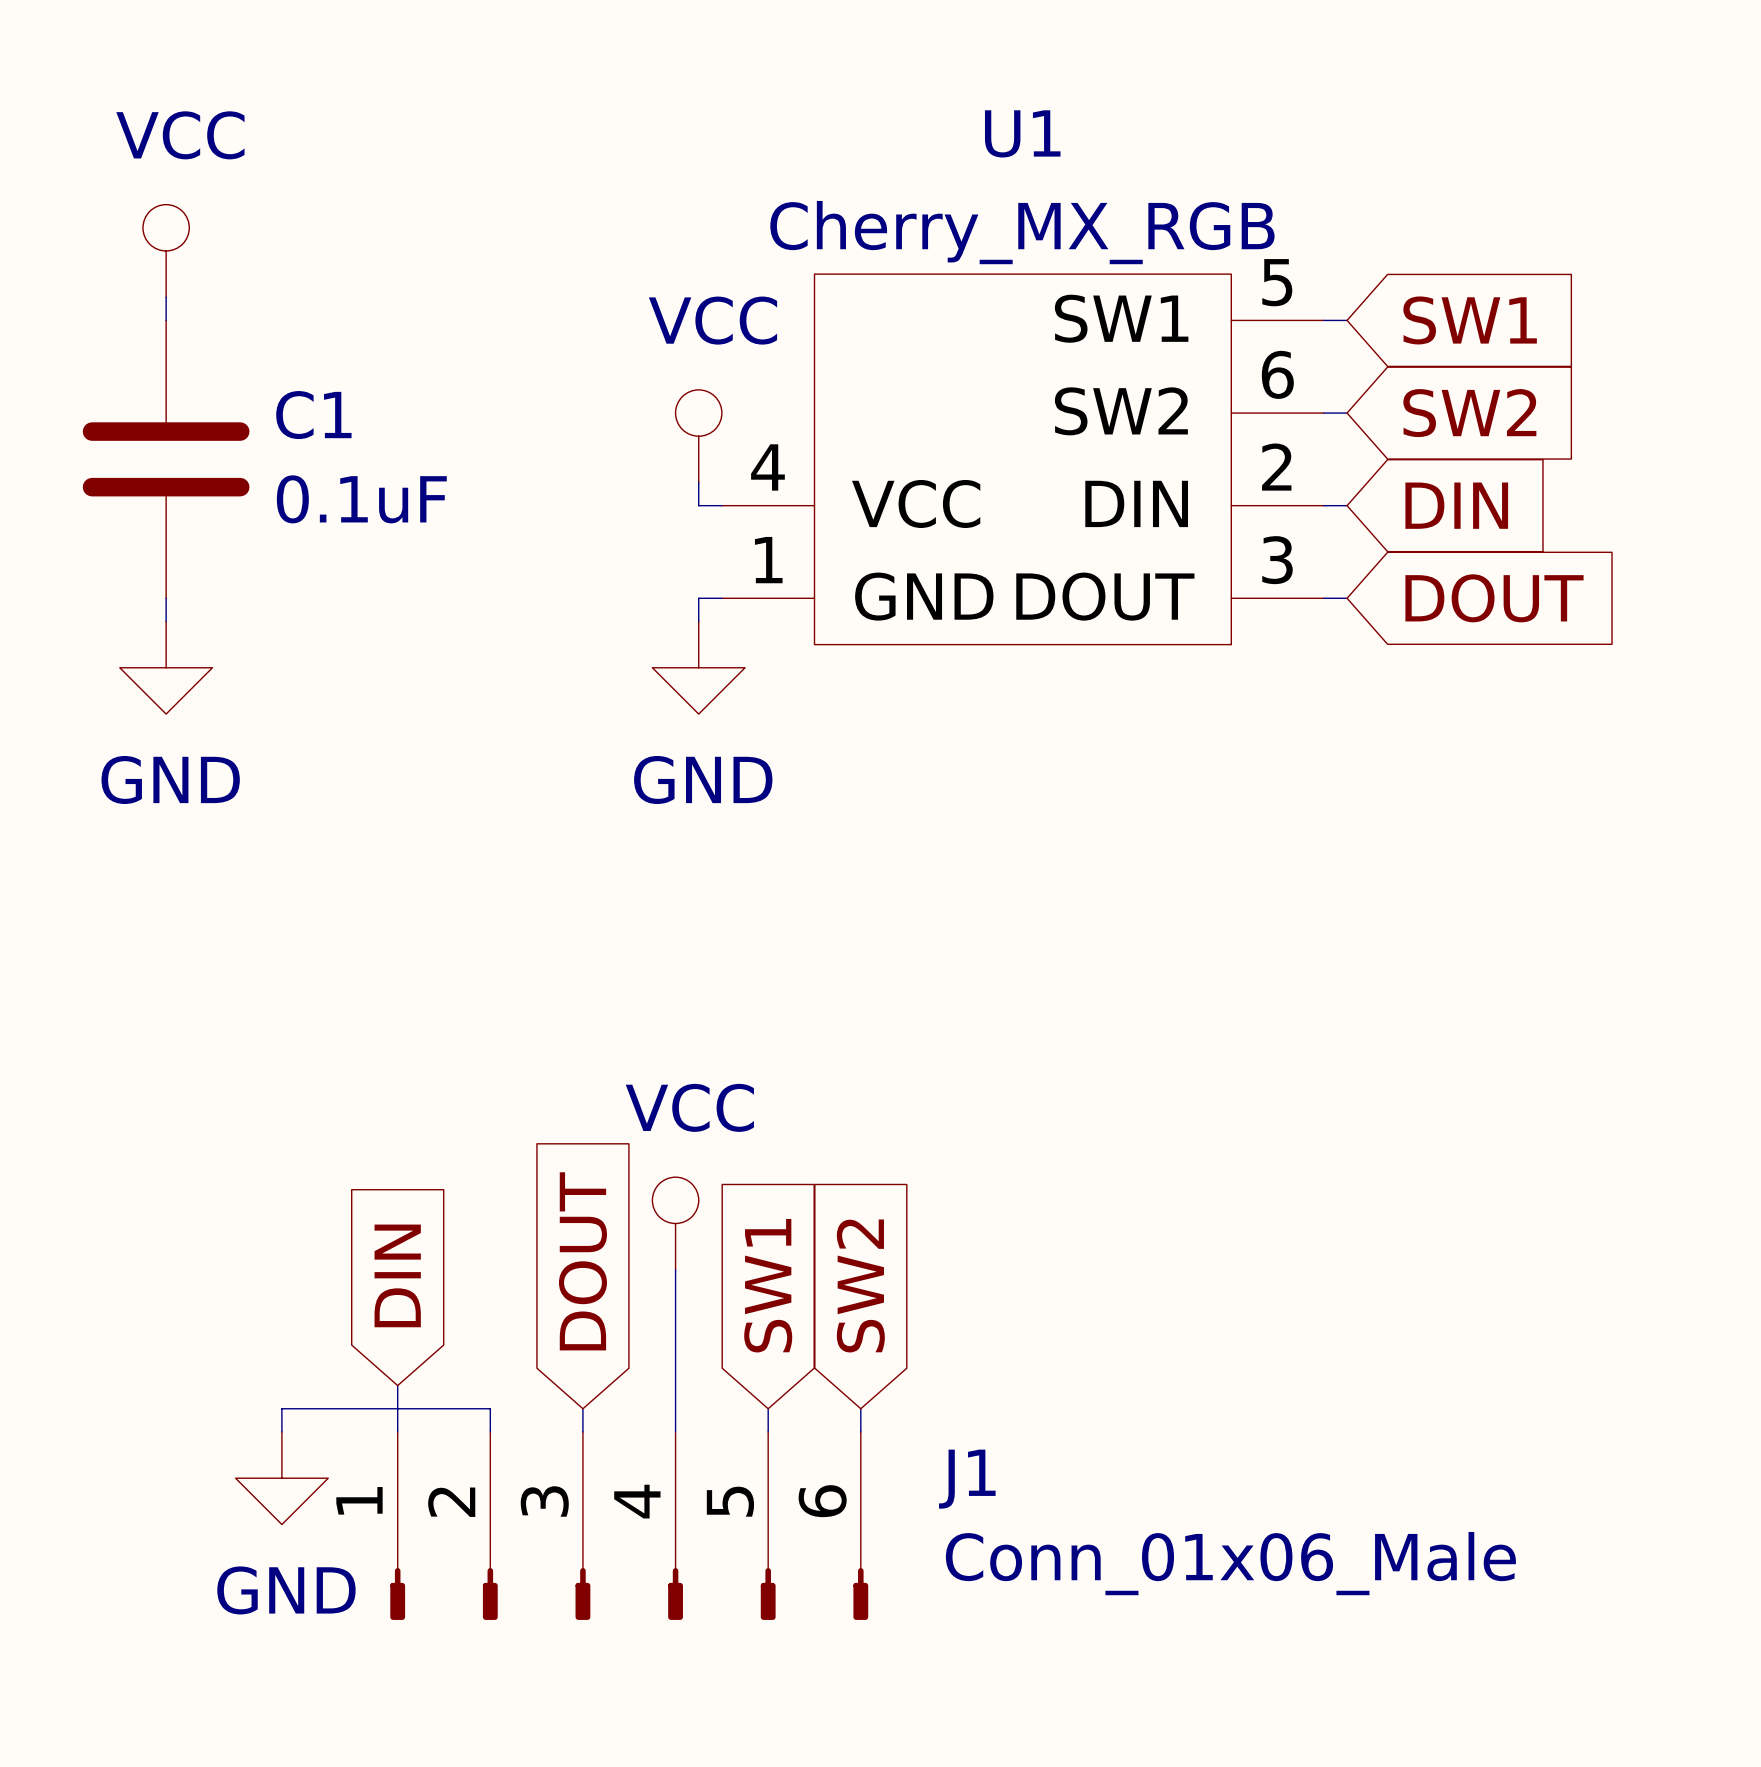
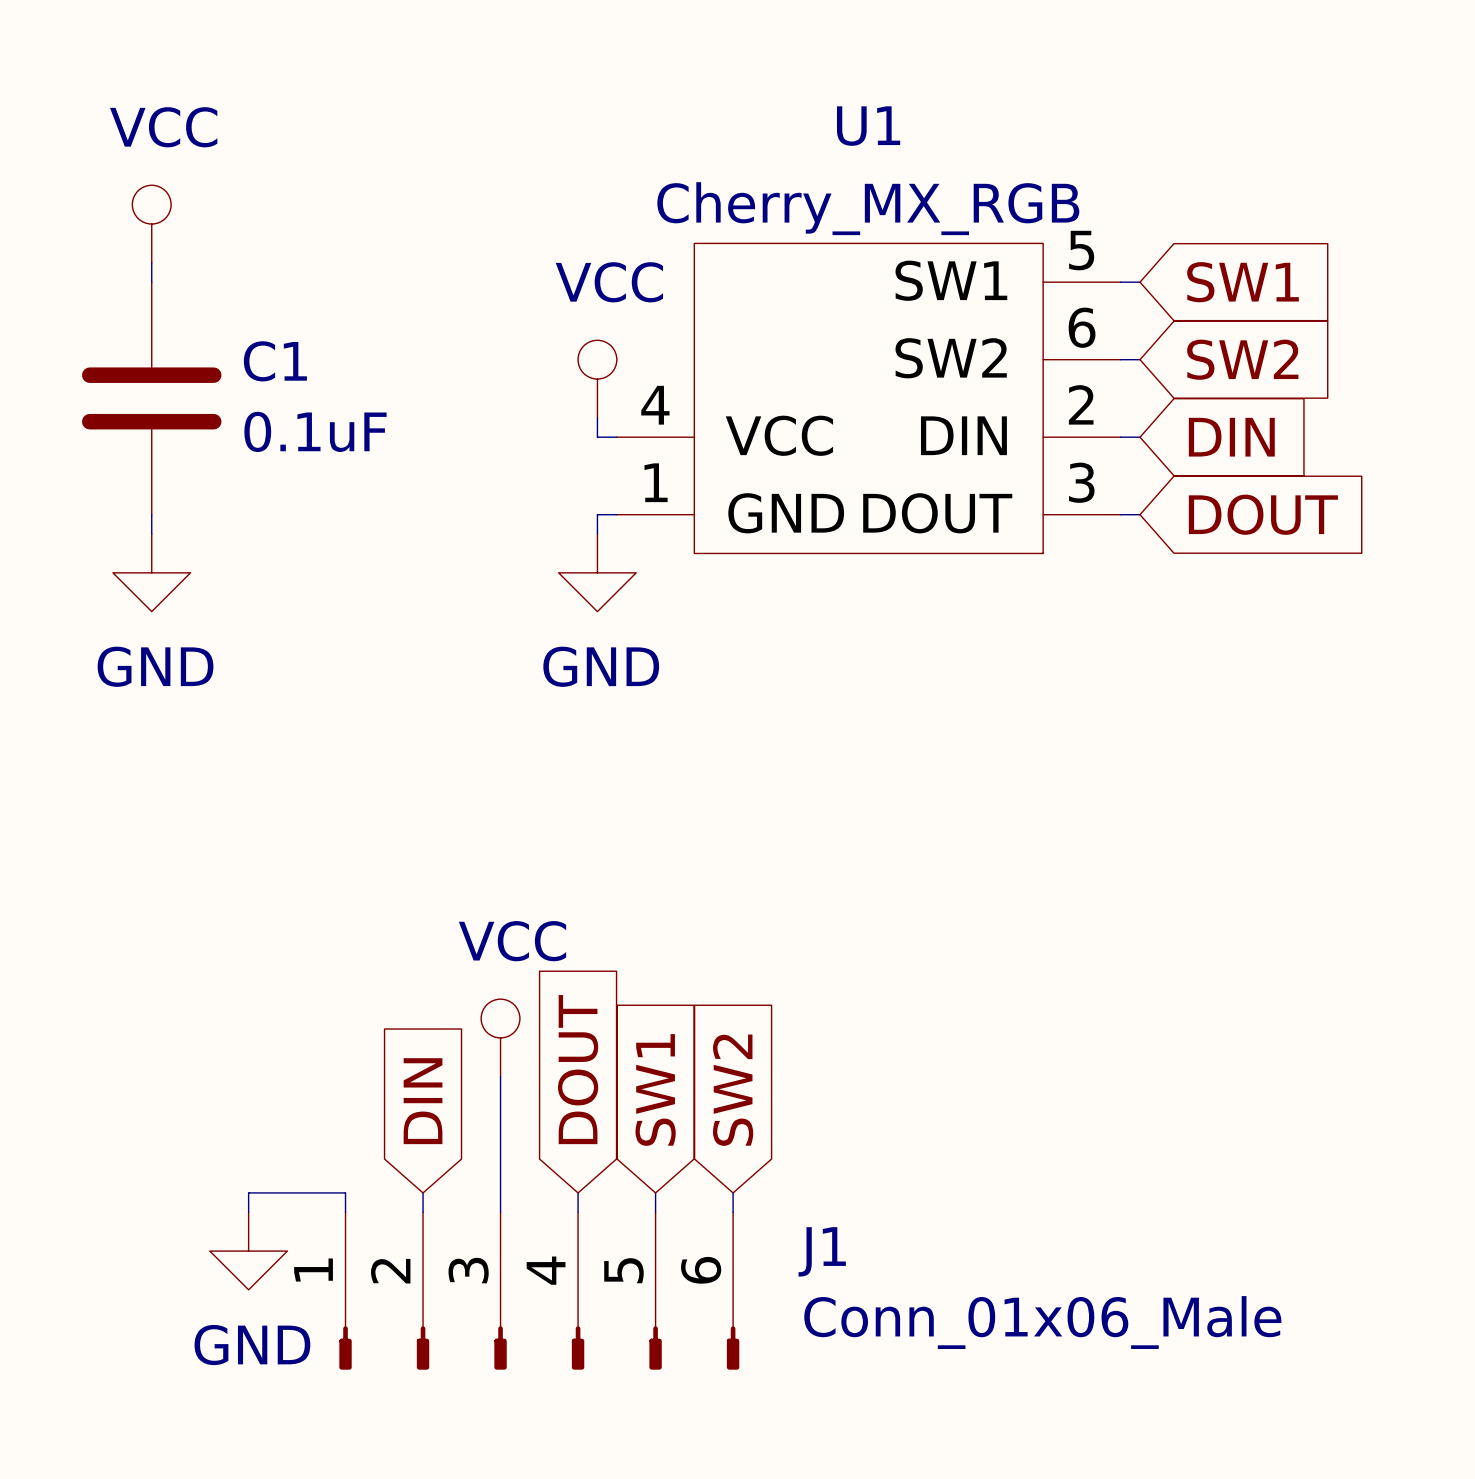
power symbol position: VCC (675, 1223) -> VCC (500, 1037)
global label position: DOUT (582, 1261) -> DOUT (578, 1069)
wire: (675, 1269) (675, 1408) -> (500, 1076) (500, 1192)
global label position: DIN (397, 1275) -> DIN (423, 1101)
wire: (397, 1385) (397, 1408) (490, 1408) -> none

